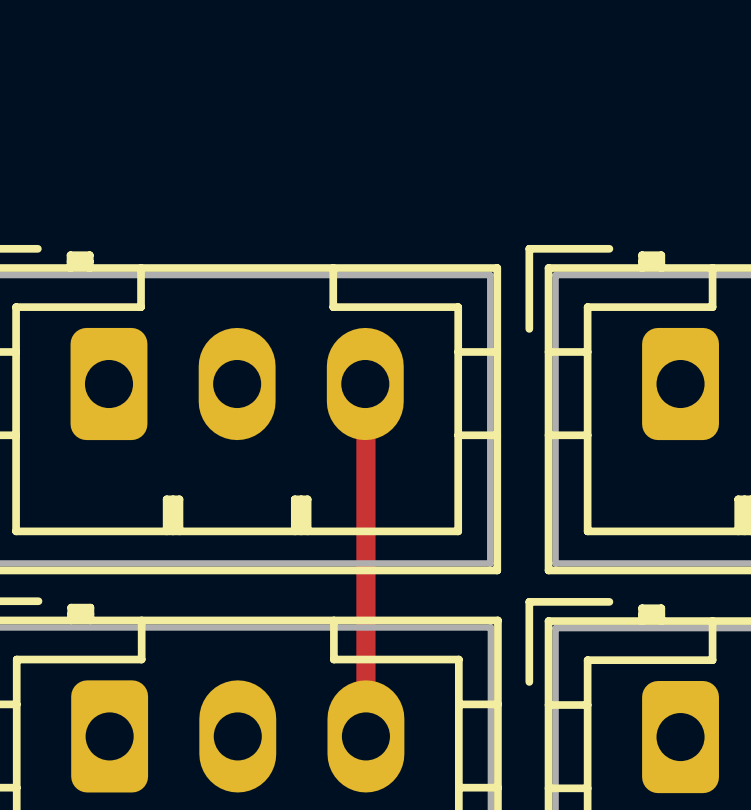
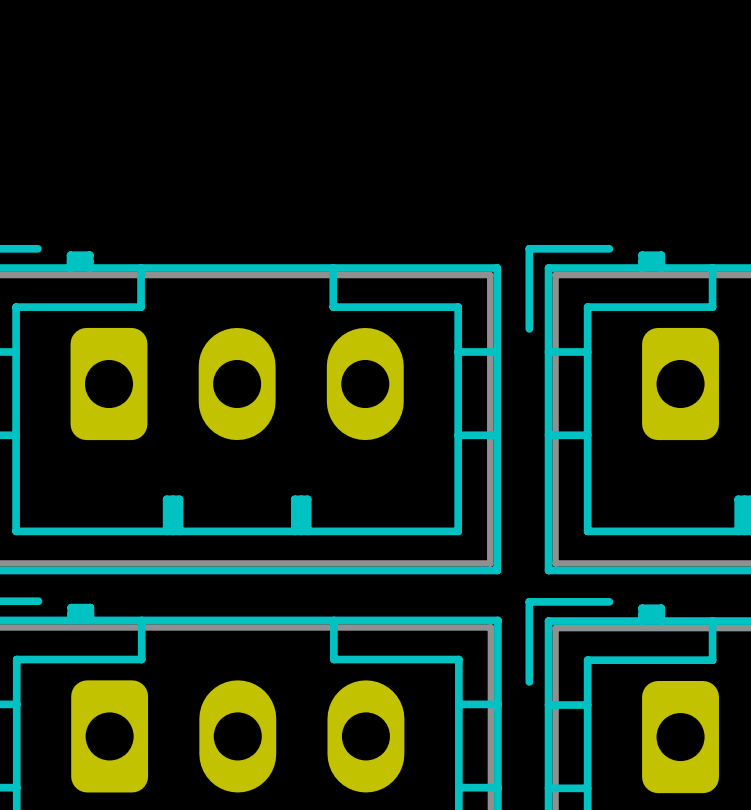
top track: (365, 384) (365, 736) -> none

